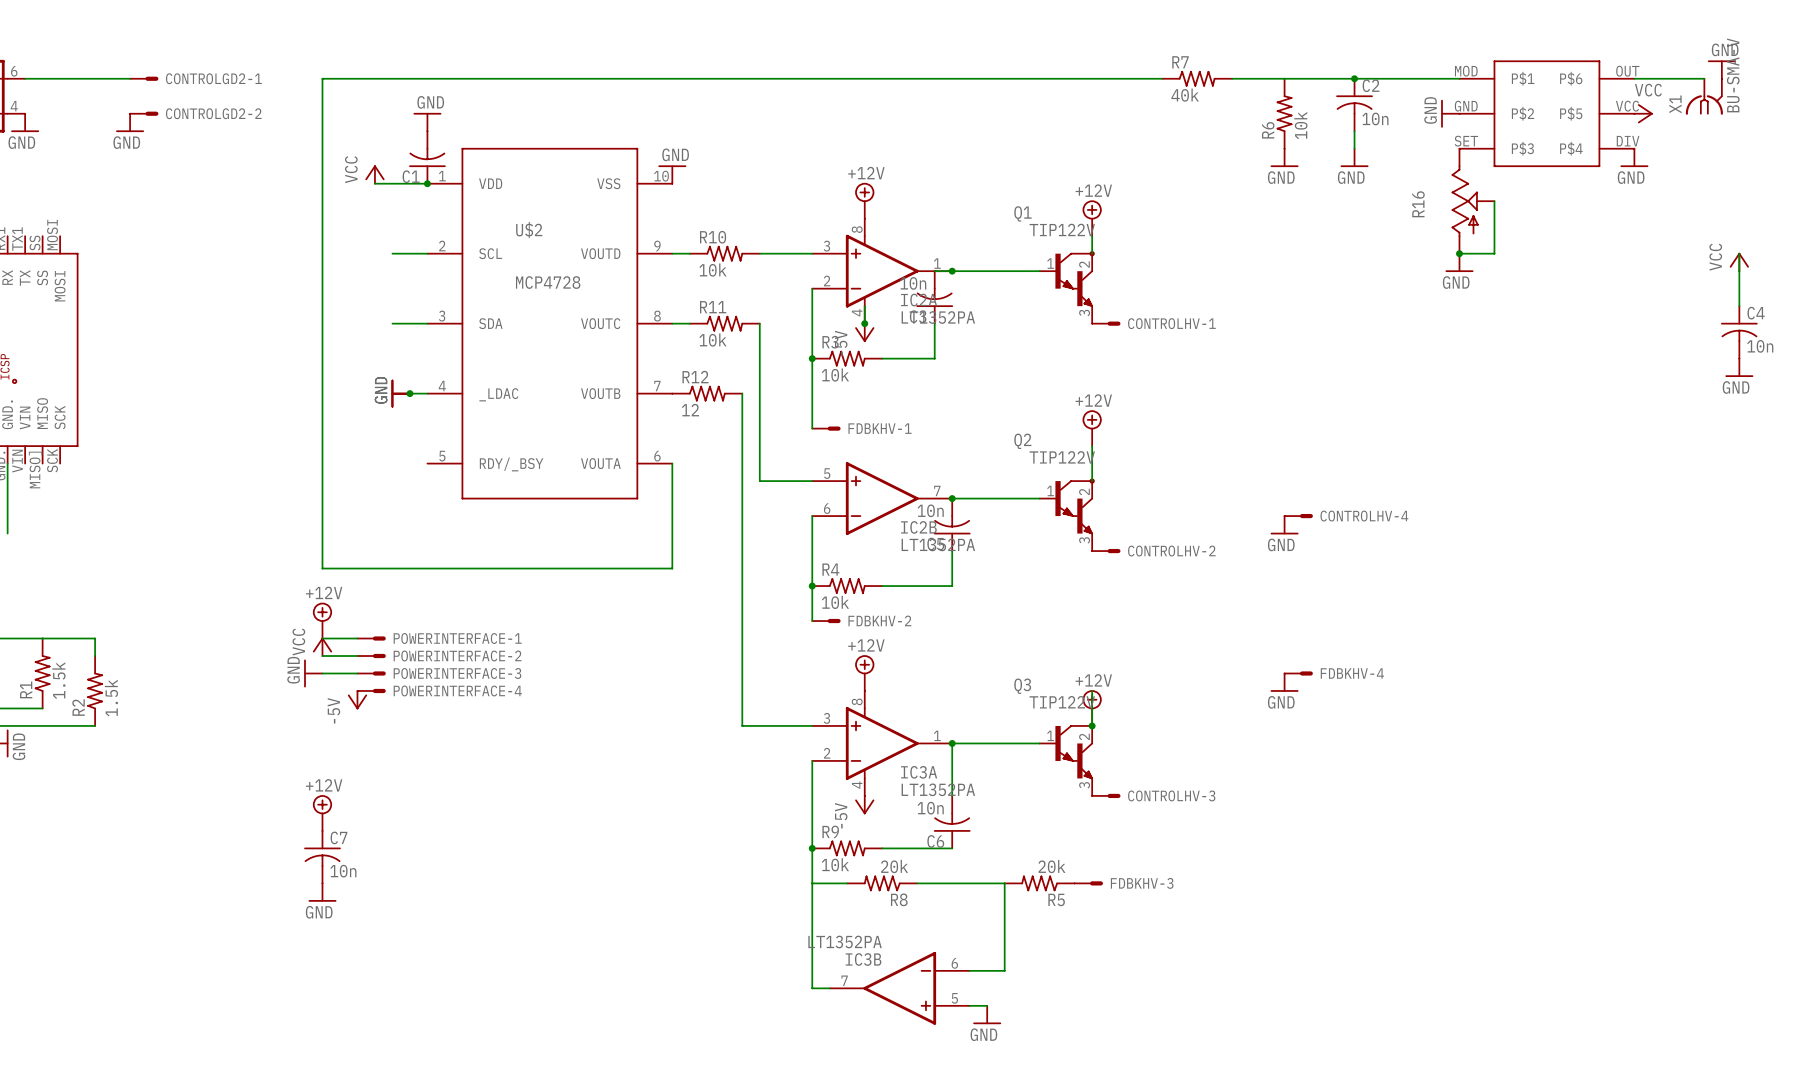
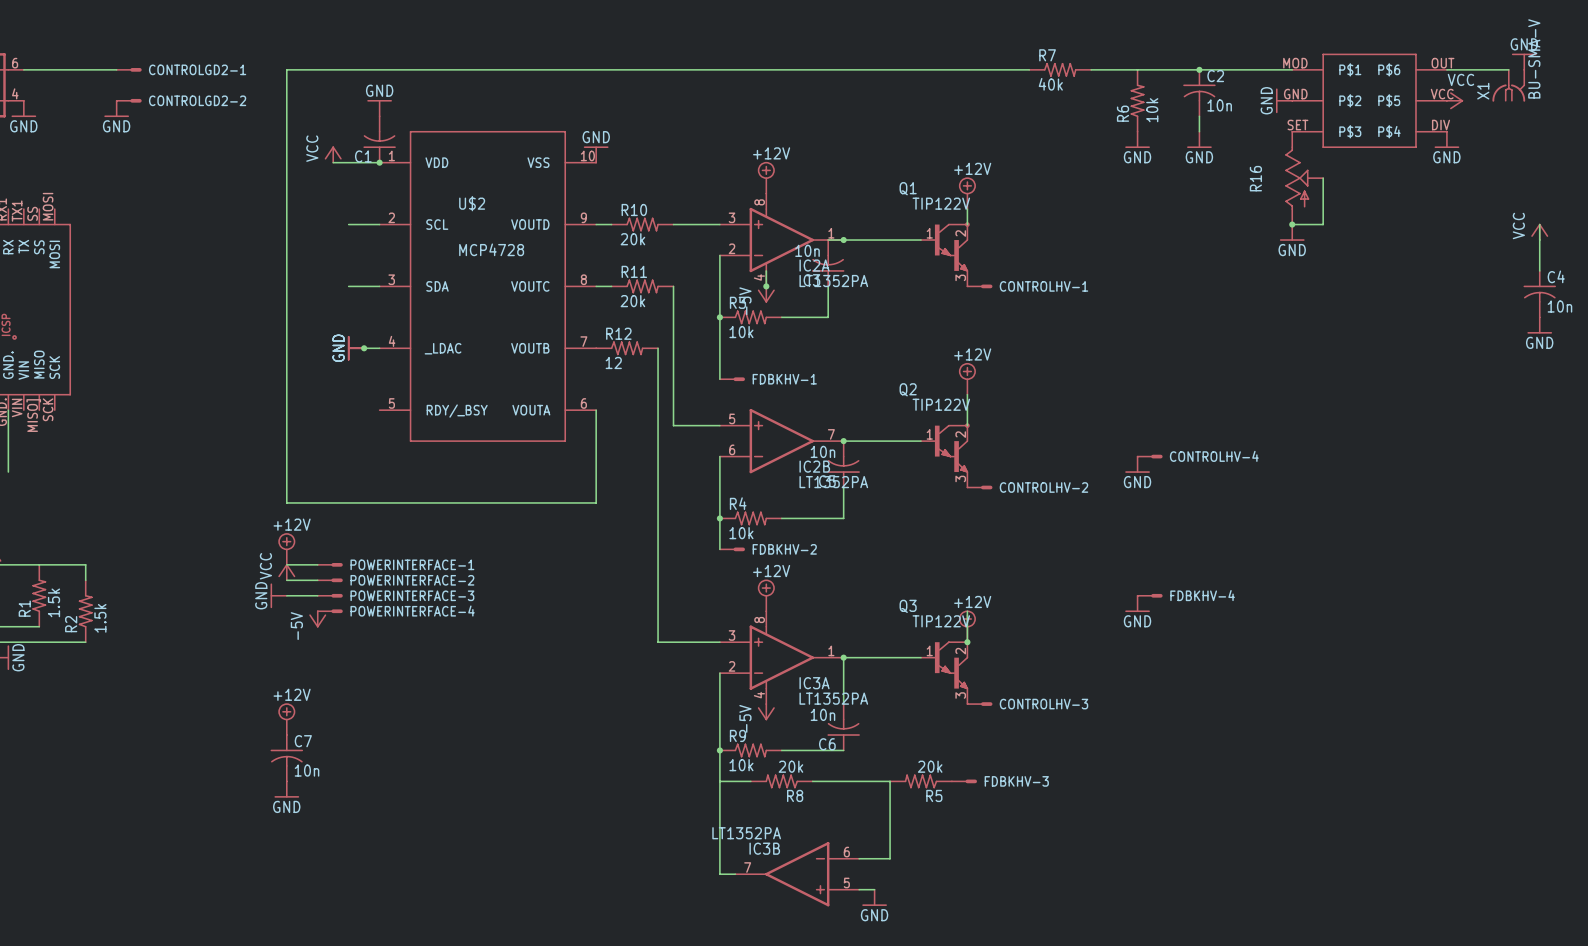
R10 value: 10k (712, 270) -> 20k (632, 239)
R11 value: 10k (712, 340) -> 20k (632, 301)

